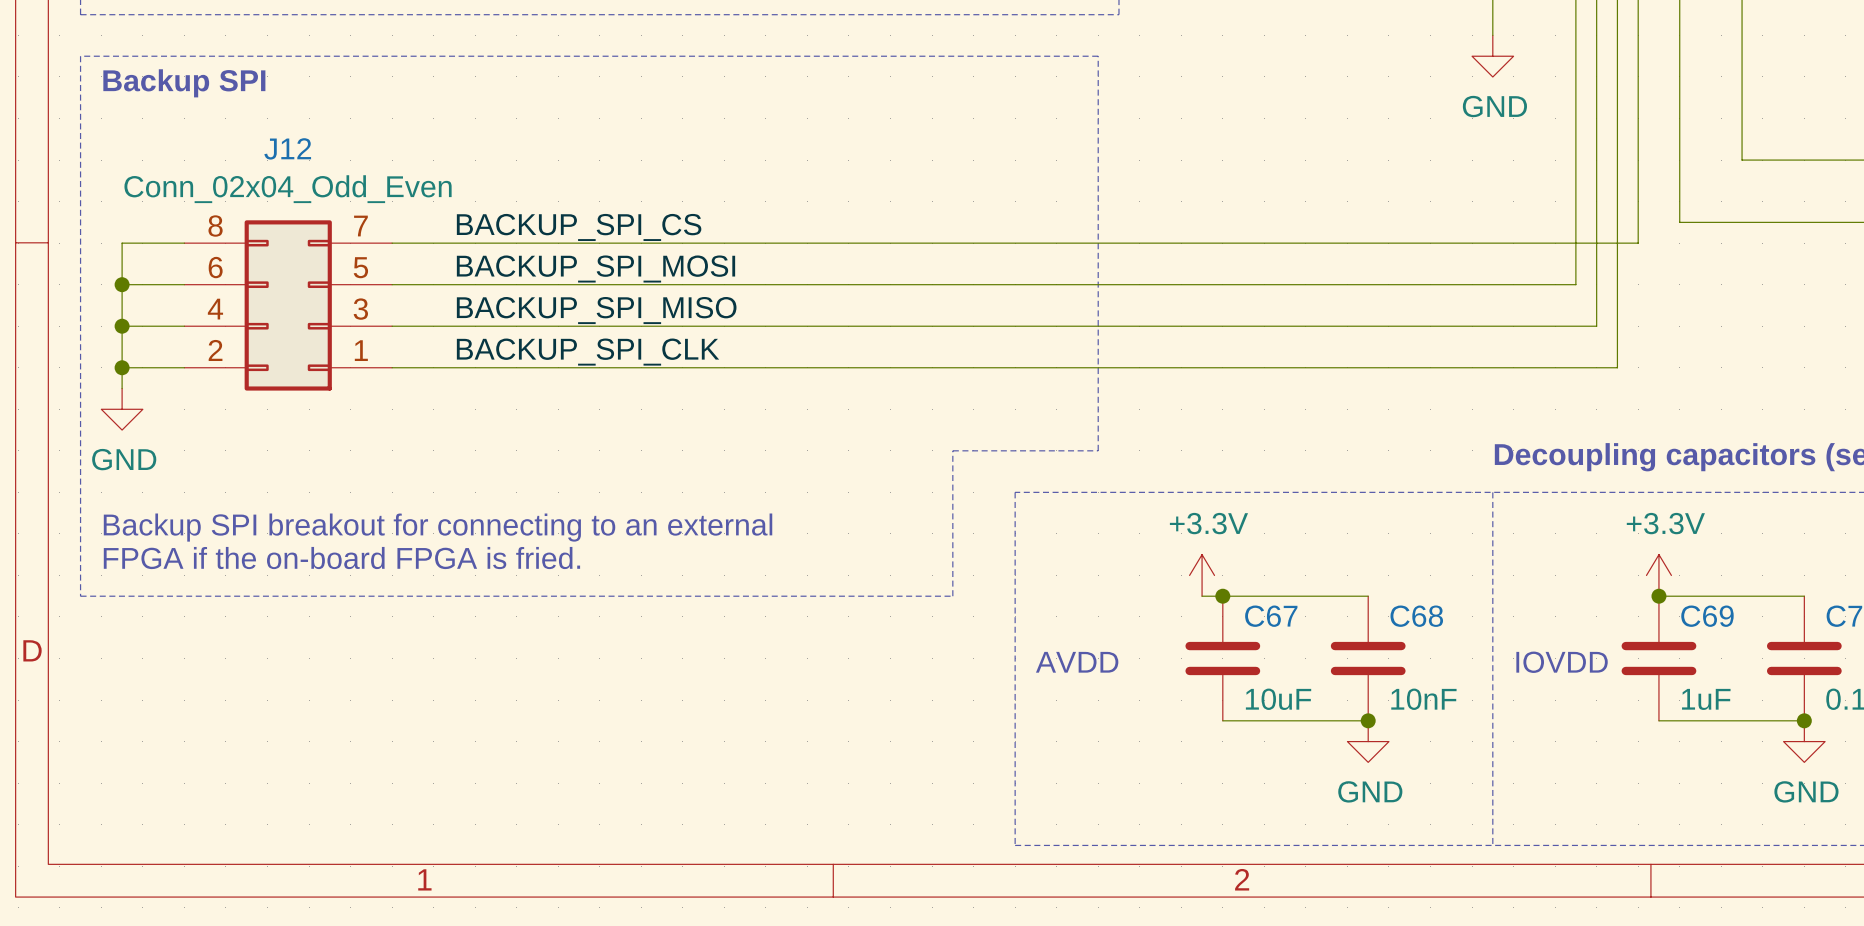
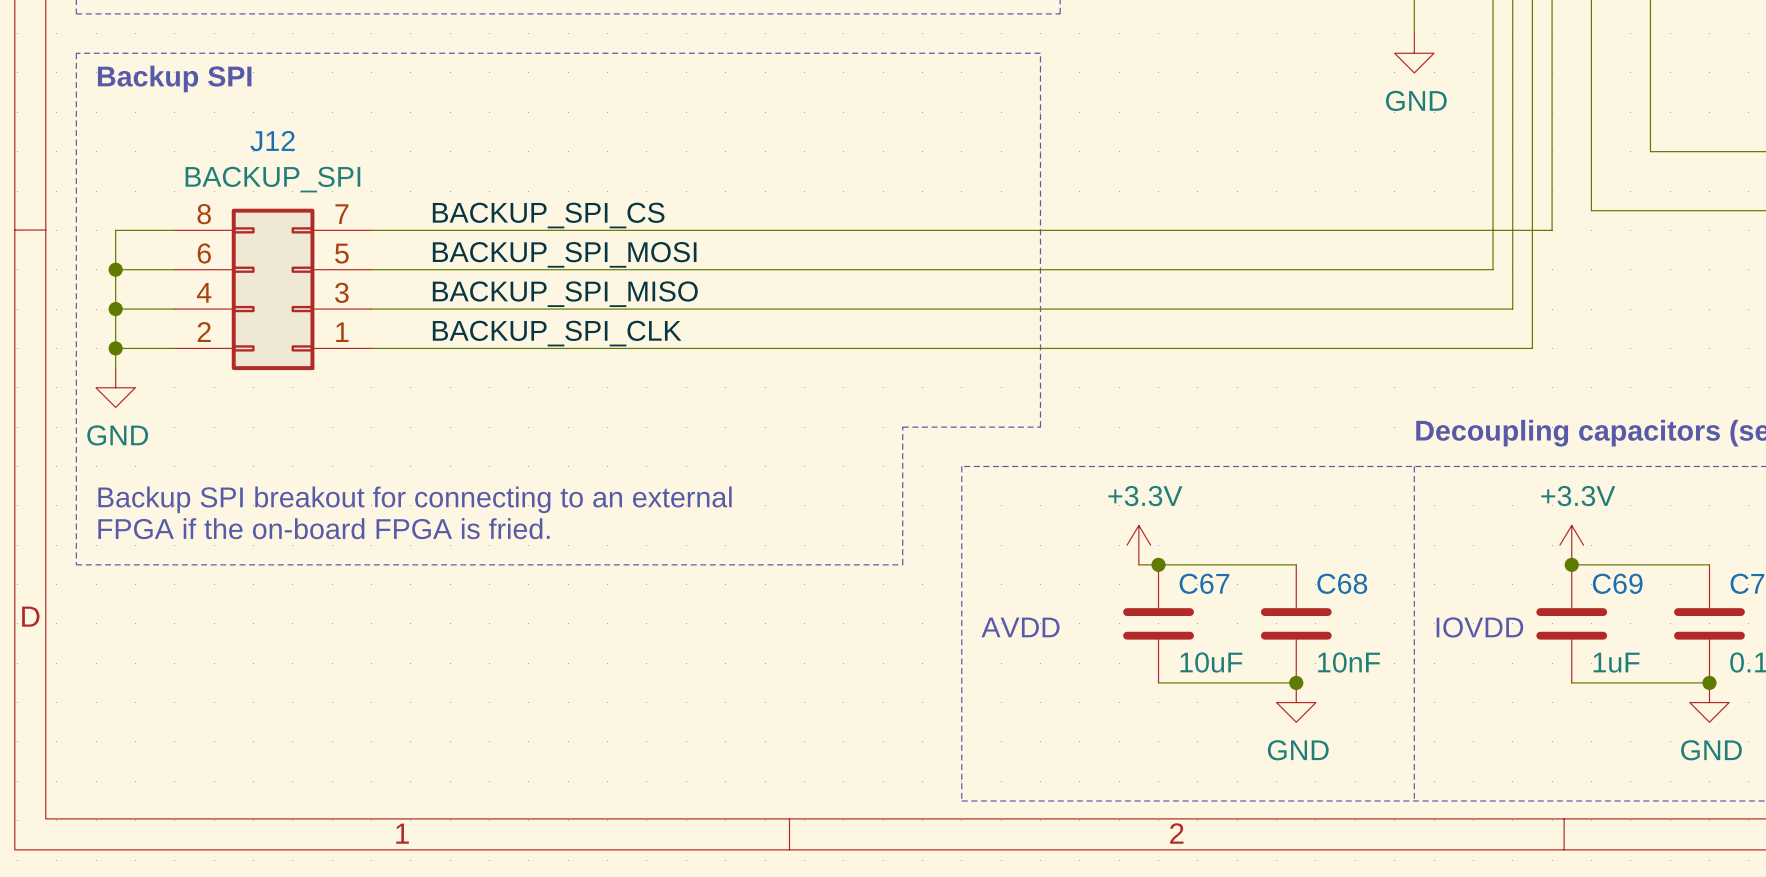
J12 value: Conn_02x04_Odd_Even (288, 189) -> BACKUP_SPI (272, 179)

